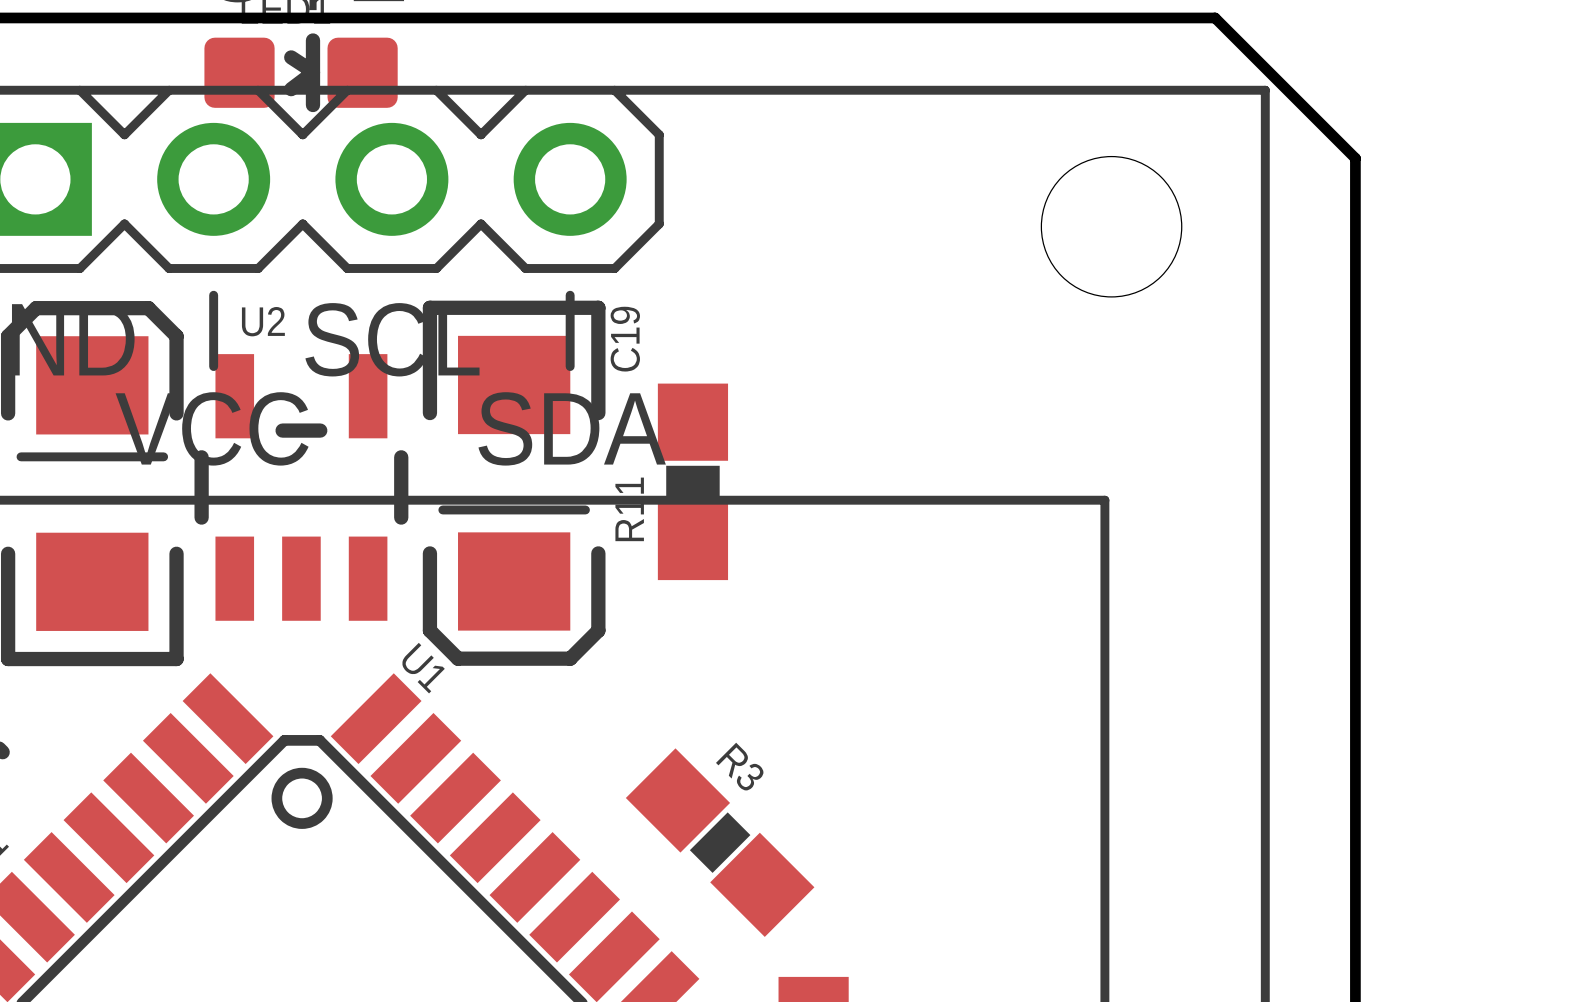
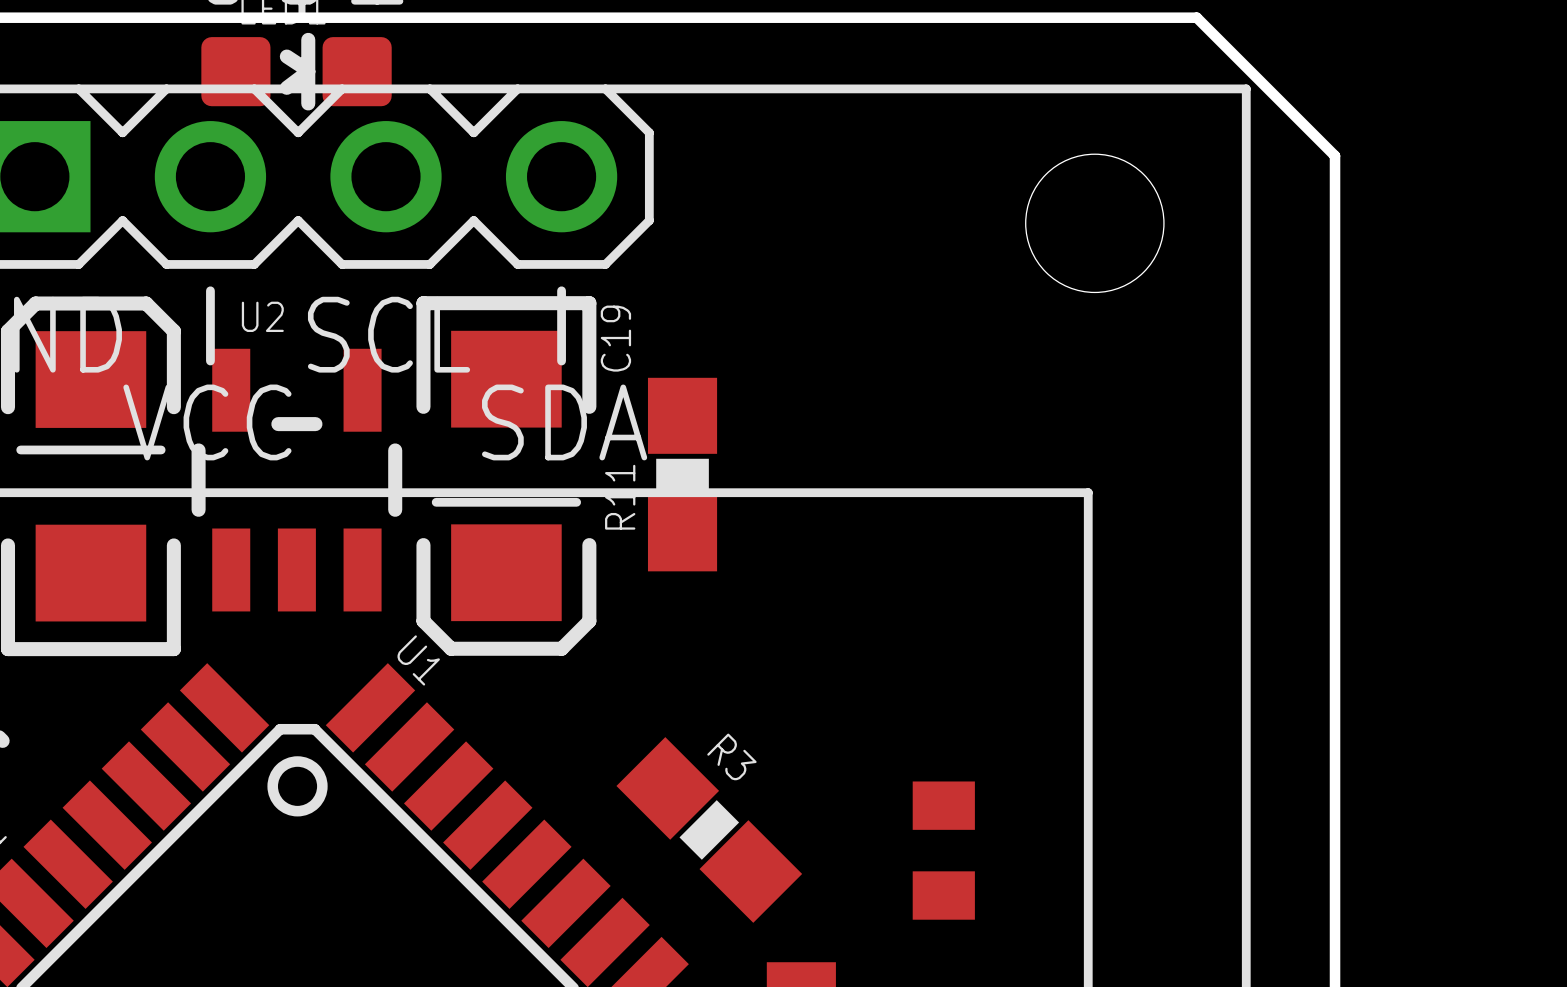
part: none -> (943, 850)

